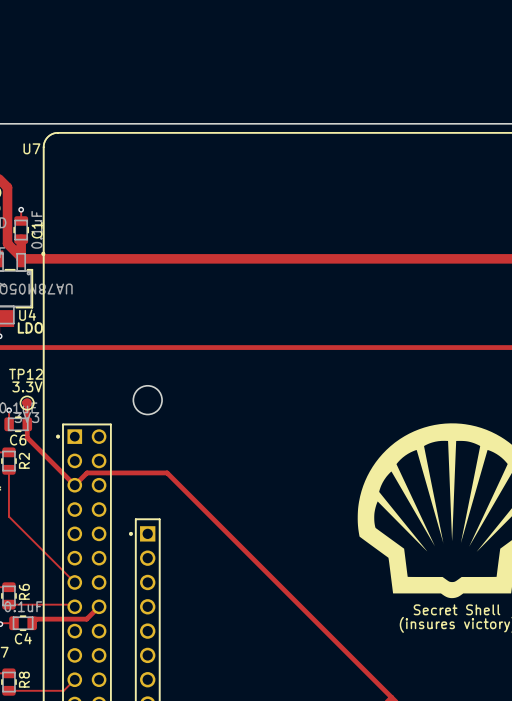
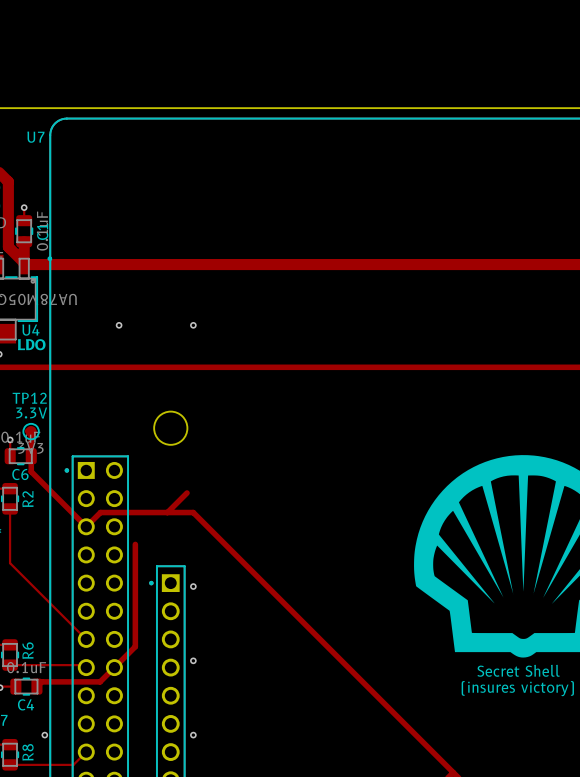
via: none -> (119, 325)
via: none -> (193, 325)
top track: none -> (187, 492) (167, 512)
top track: none -> (135, 544) (135, 646) (114, 667)
via: none -> (193, 586)
via: none -> (193, 660)
via: none -> (44, 735)
via: none -> (193, 735)

